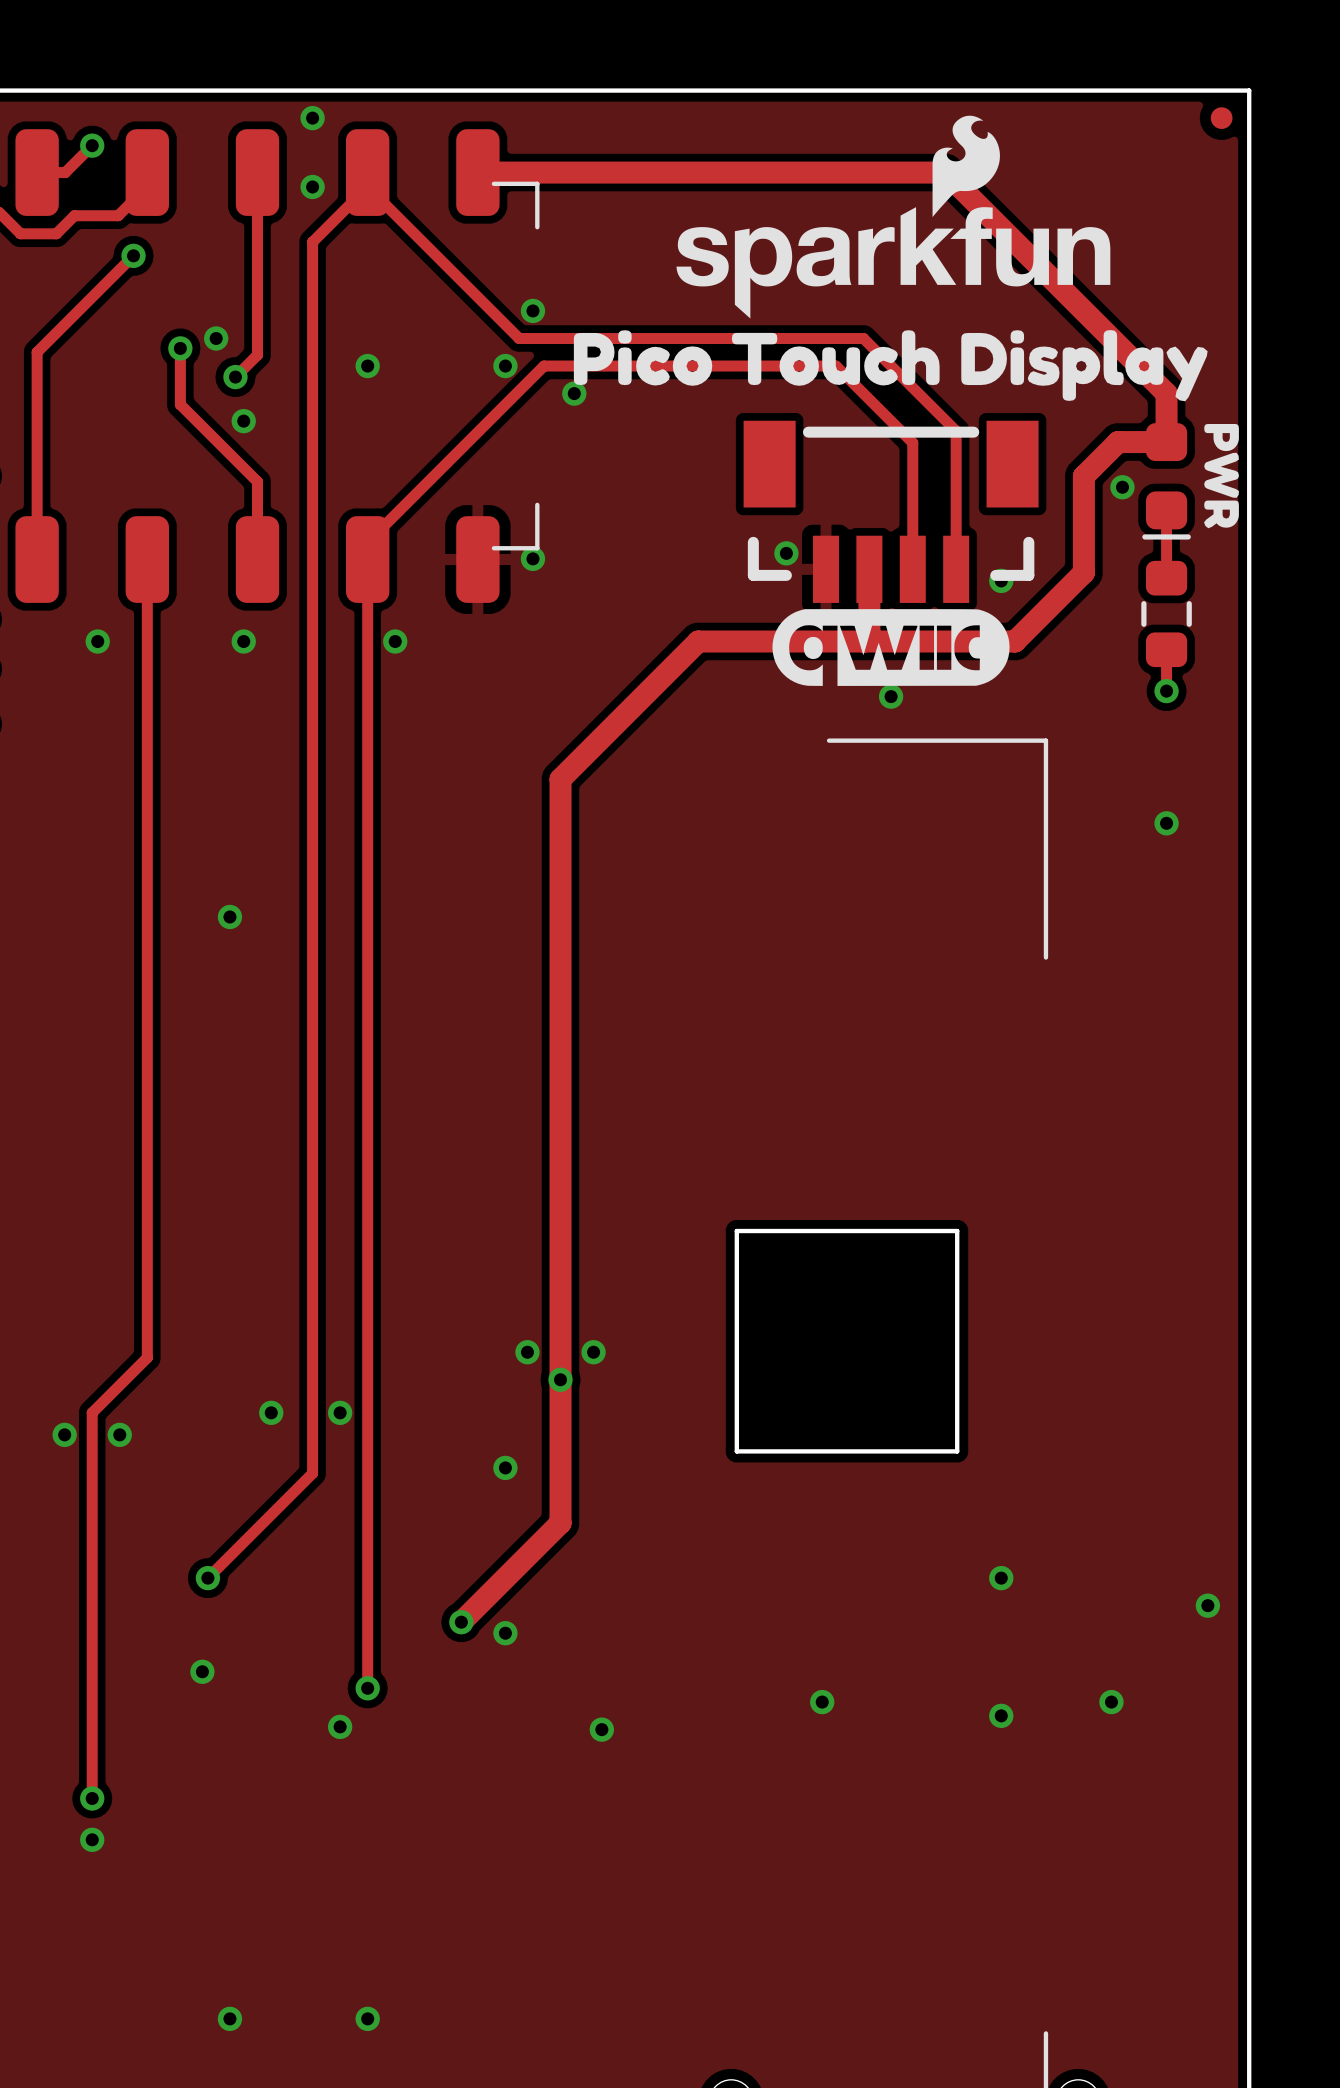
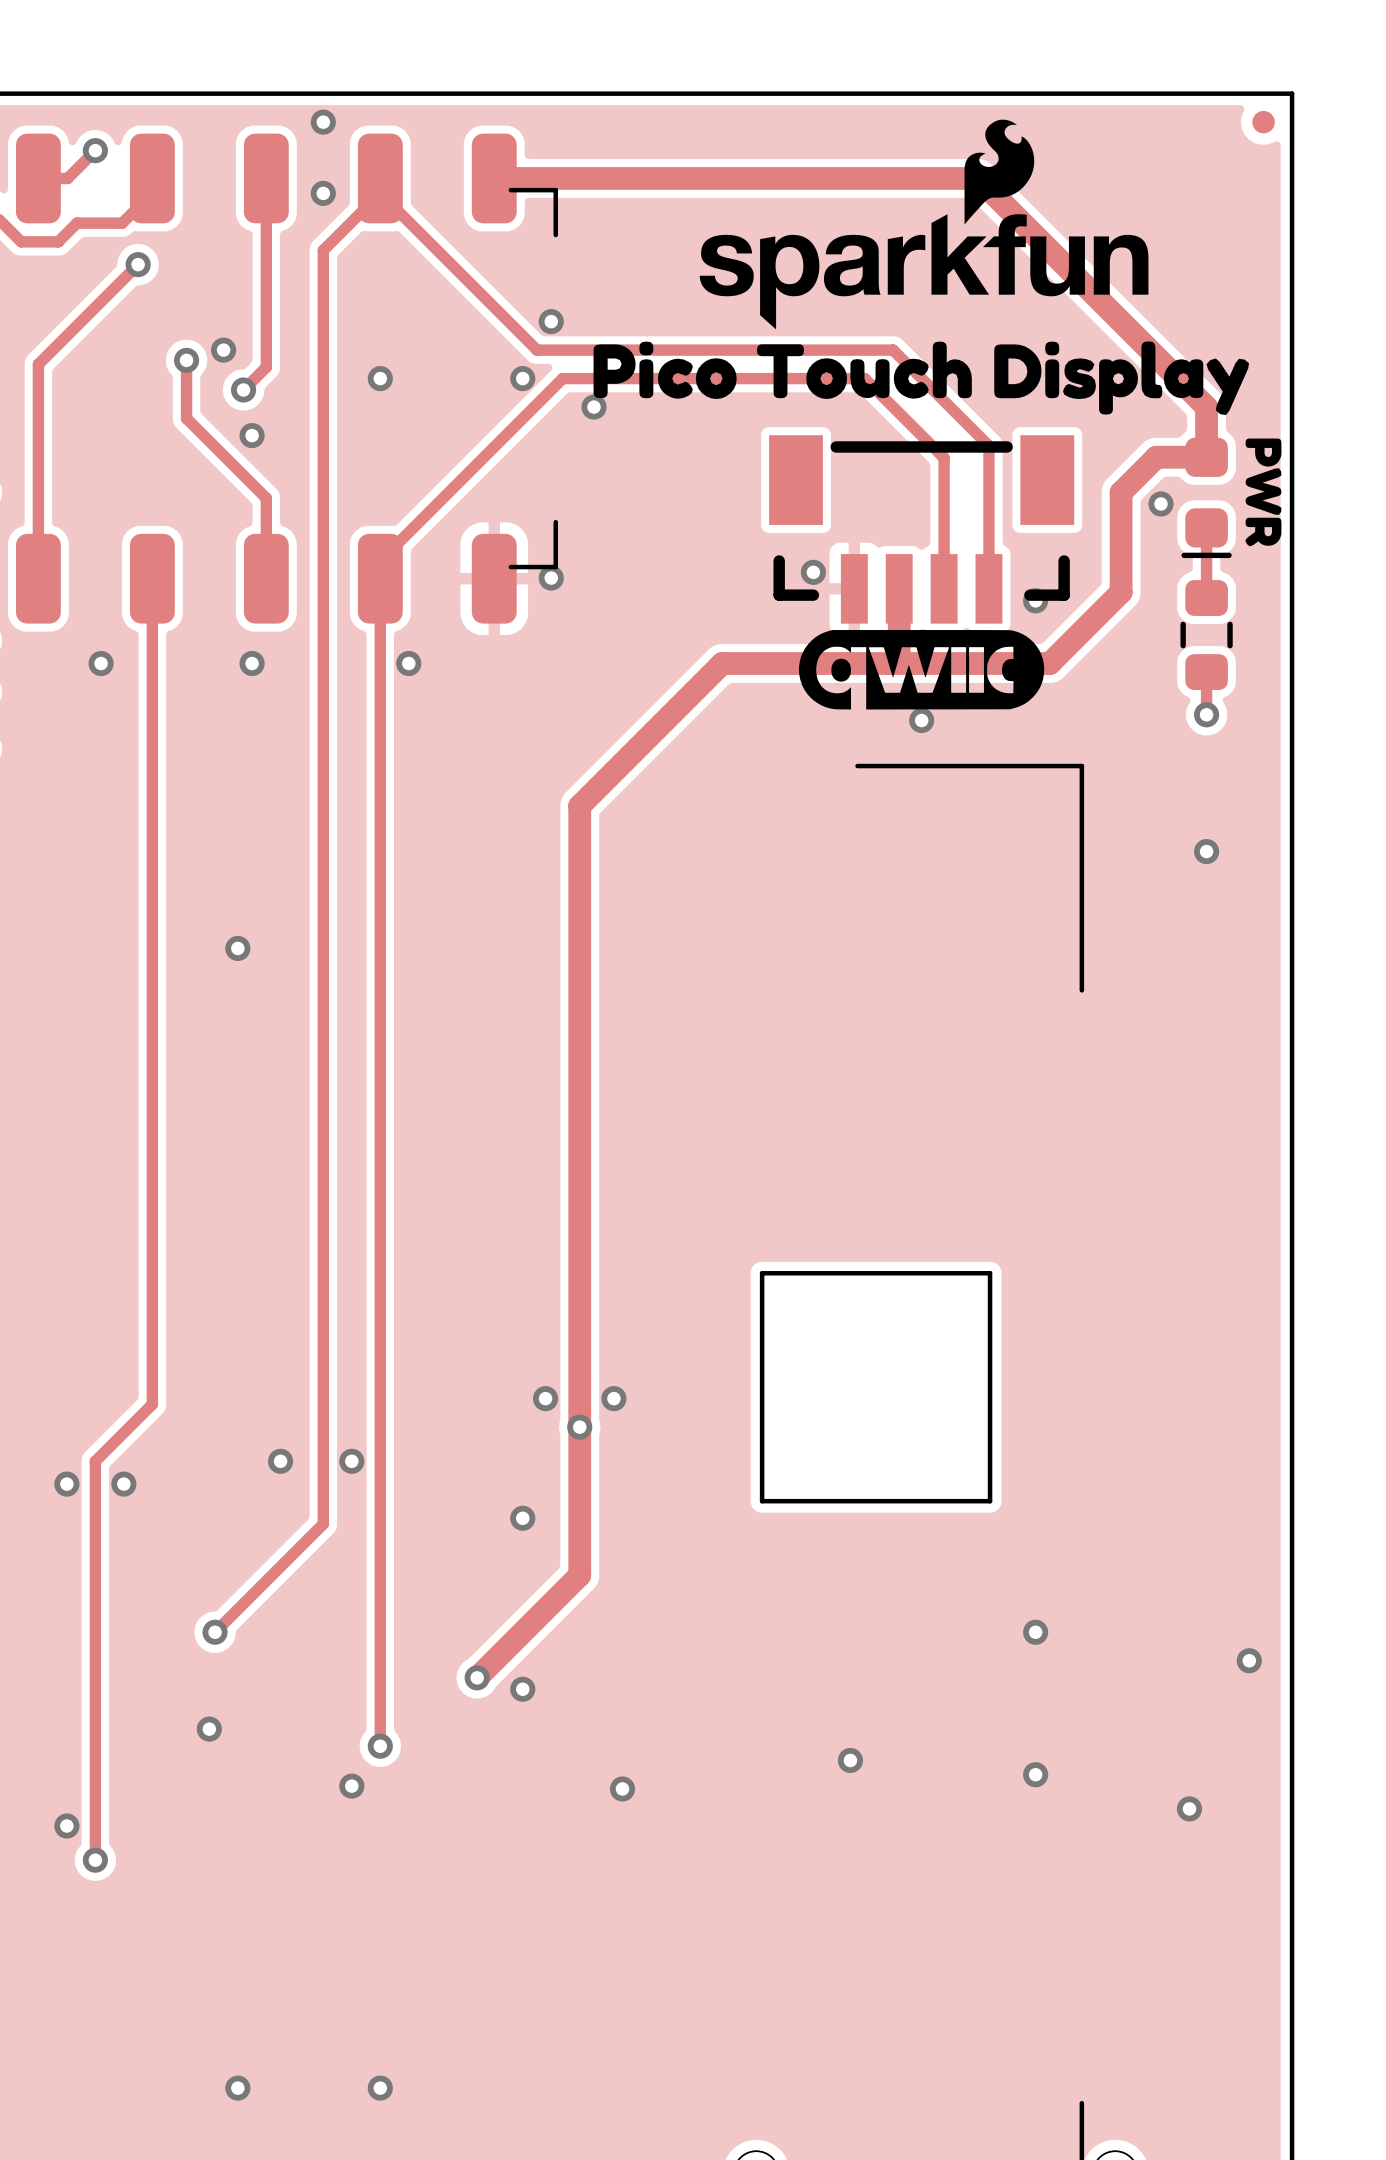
via position: (1111, 1702) -> (1189, 1808)
via position: (92, 1839) -> (66, 1826)

